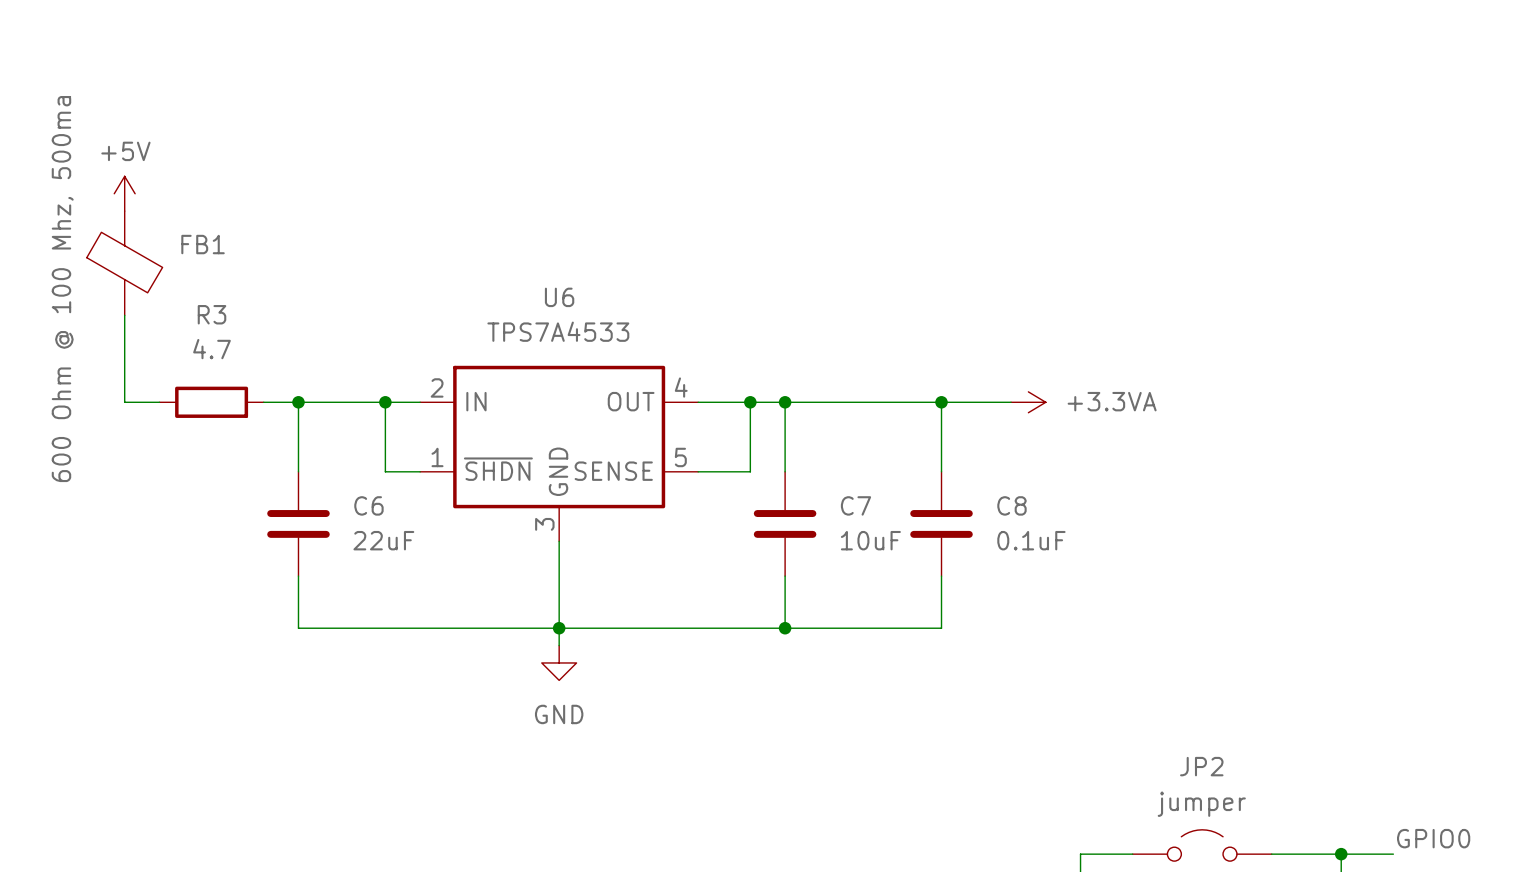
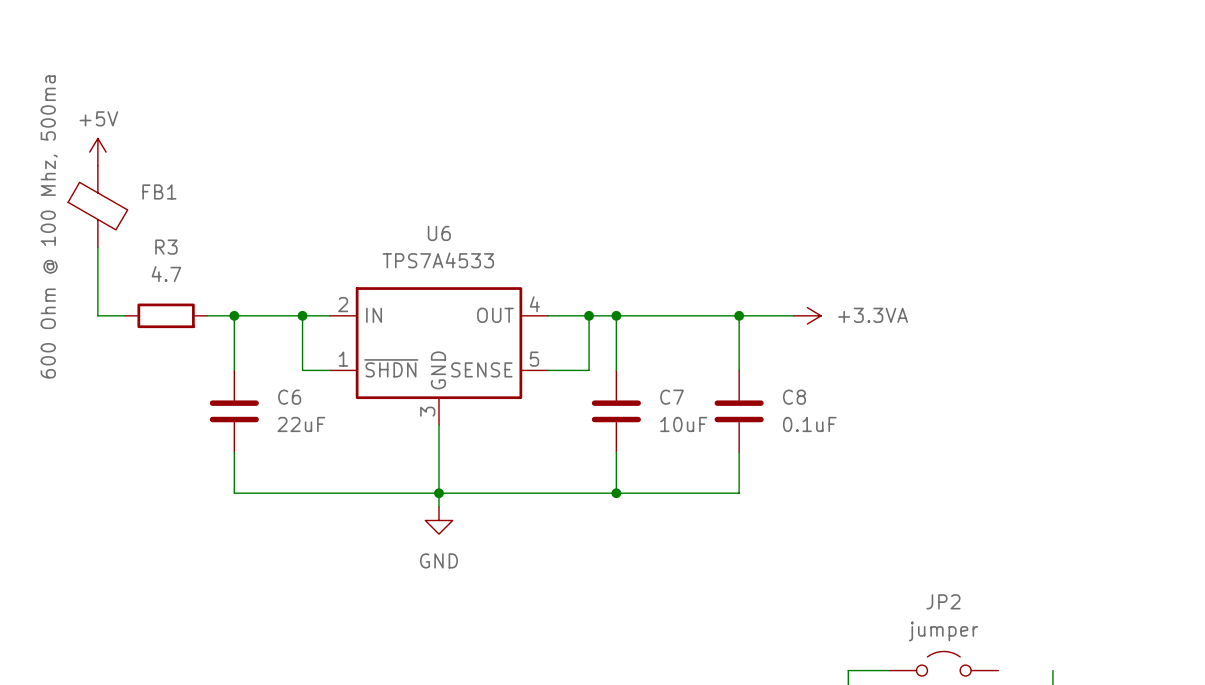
label: GPIO0 (1433, 838) -> none
wire: (1271, 854) (1393, 854) -> none
junction: (1341, 854) -> none

